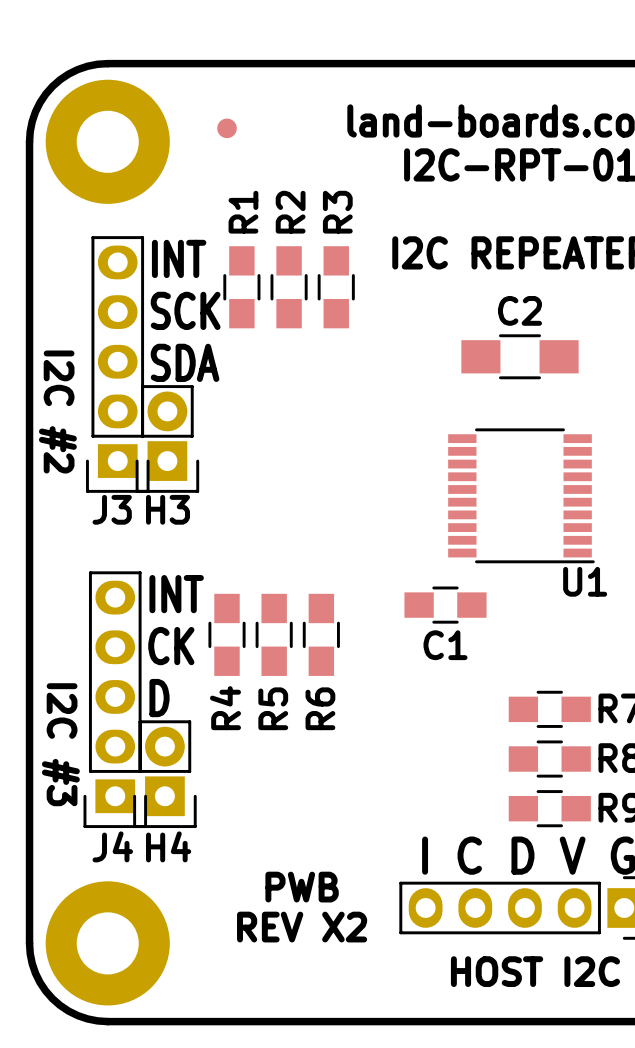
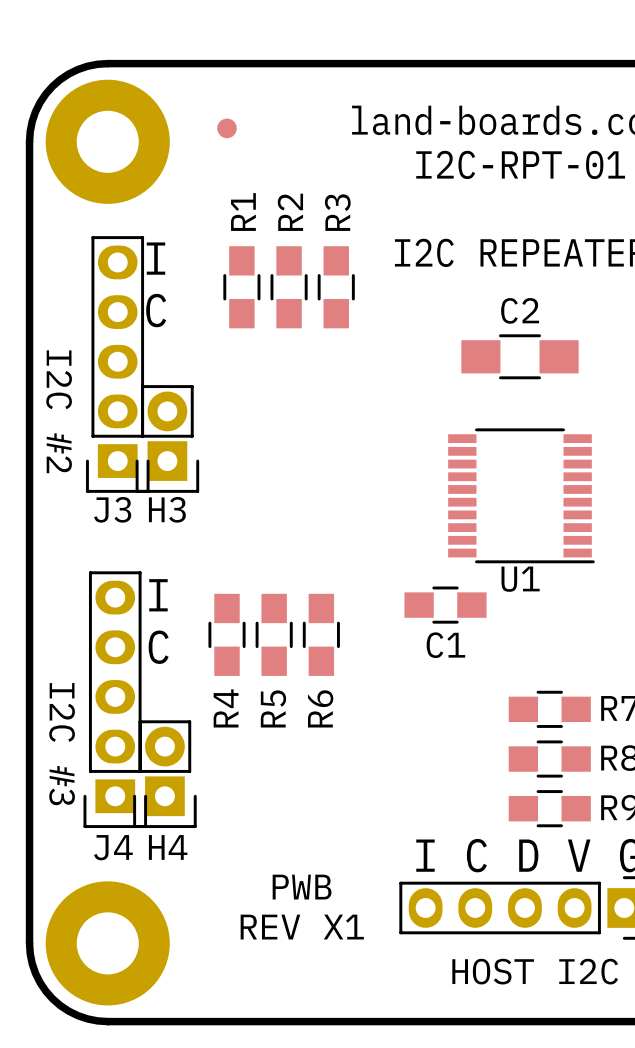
text: INT (179, 258) -> I (155, 258)
text: SCK (185, 310) -> C (156, 310)
text: SDA (185, 362) -> none
U1 name position: U1 (585, 581) -> U1 (520, 579)
text: INT (176, 594) -> I (158, 595)
text: CK (171, 646) -> C (158, 647)
text: D (159, 698) -> none
text: REV X2 (302, 927) -> REV X1 (302, 927)

